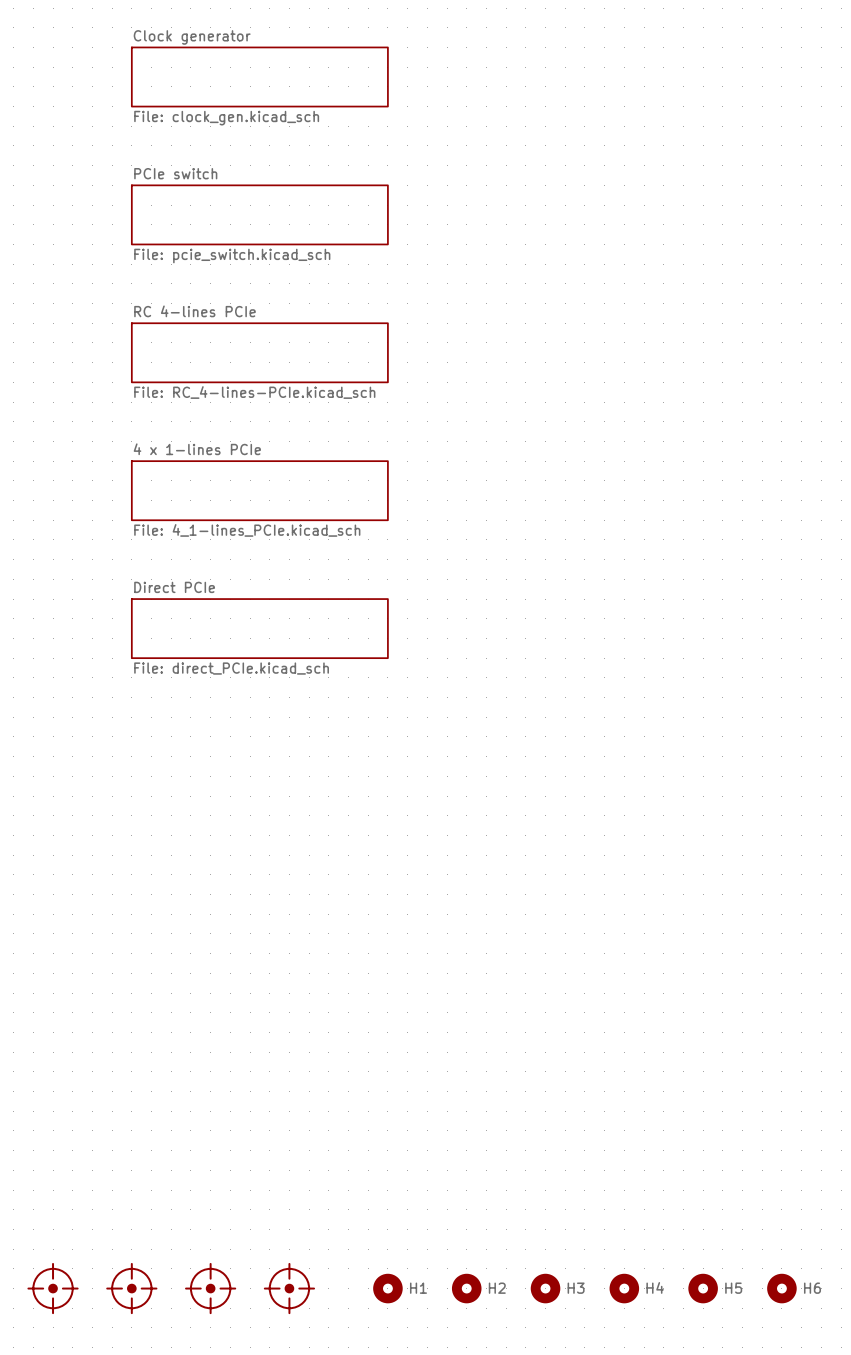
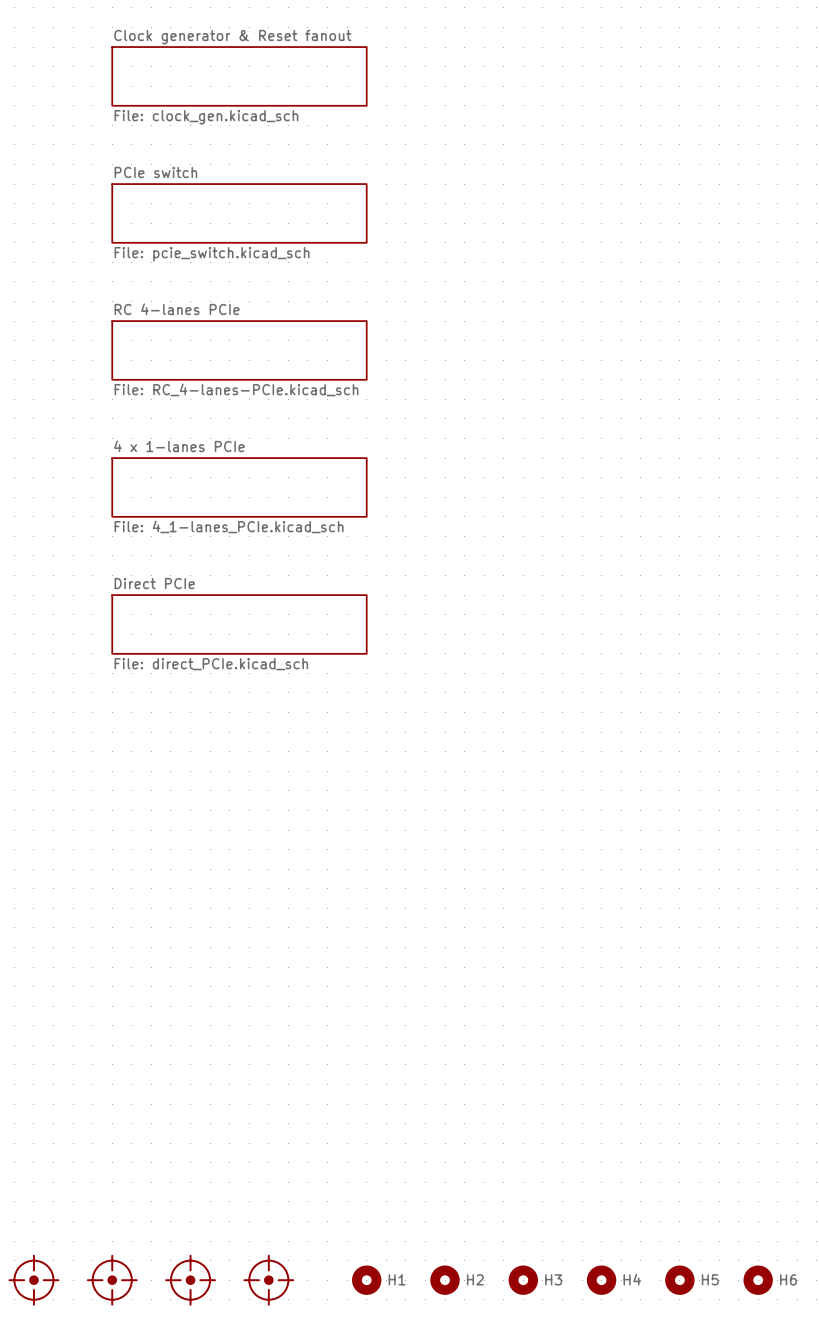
sheet Clock generator name: Clock generator (192, 37) -> Clock generator & Reset fanout (232, 37)
sheet RC 4-lines PCIe name: RC 4-lines PCIe (194, 311) -> RC 4-lanes PCIe (177, 309)
sheet RC 4-lines PCIe value: File: RC_4-lines-PCIe.kicad_sch (254, 392) -> File: RC_4-lanes-PCIe.kicad_sch (236, 389)
sheet 4 x 1-lines PCIe name: 4 x 1-lines PCIe (197, 449) -> 4 x 1-lanes PCIe (179, 446)
sheet 4 x 1-lines PCIe value: File: 4_1-lines_PCIe.kicad_sch (247, 530) -> File: 4_1-lanes_PCIe.kicad_sch (229, 526)

